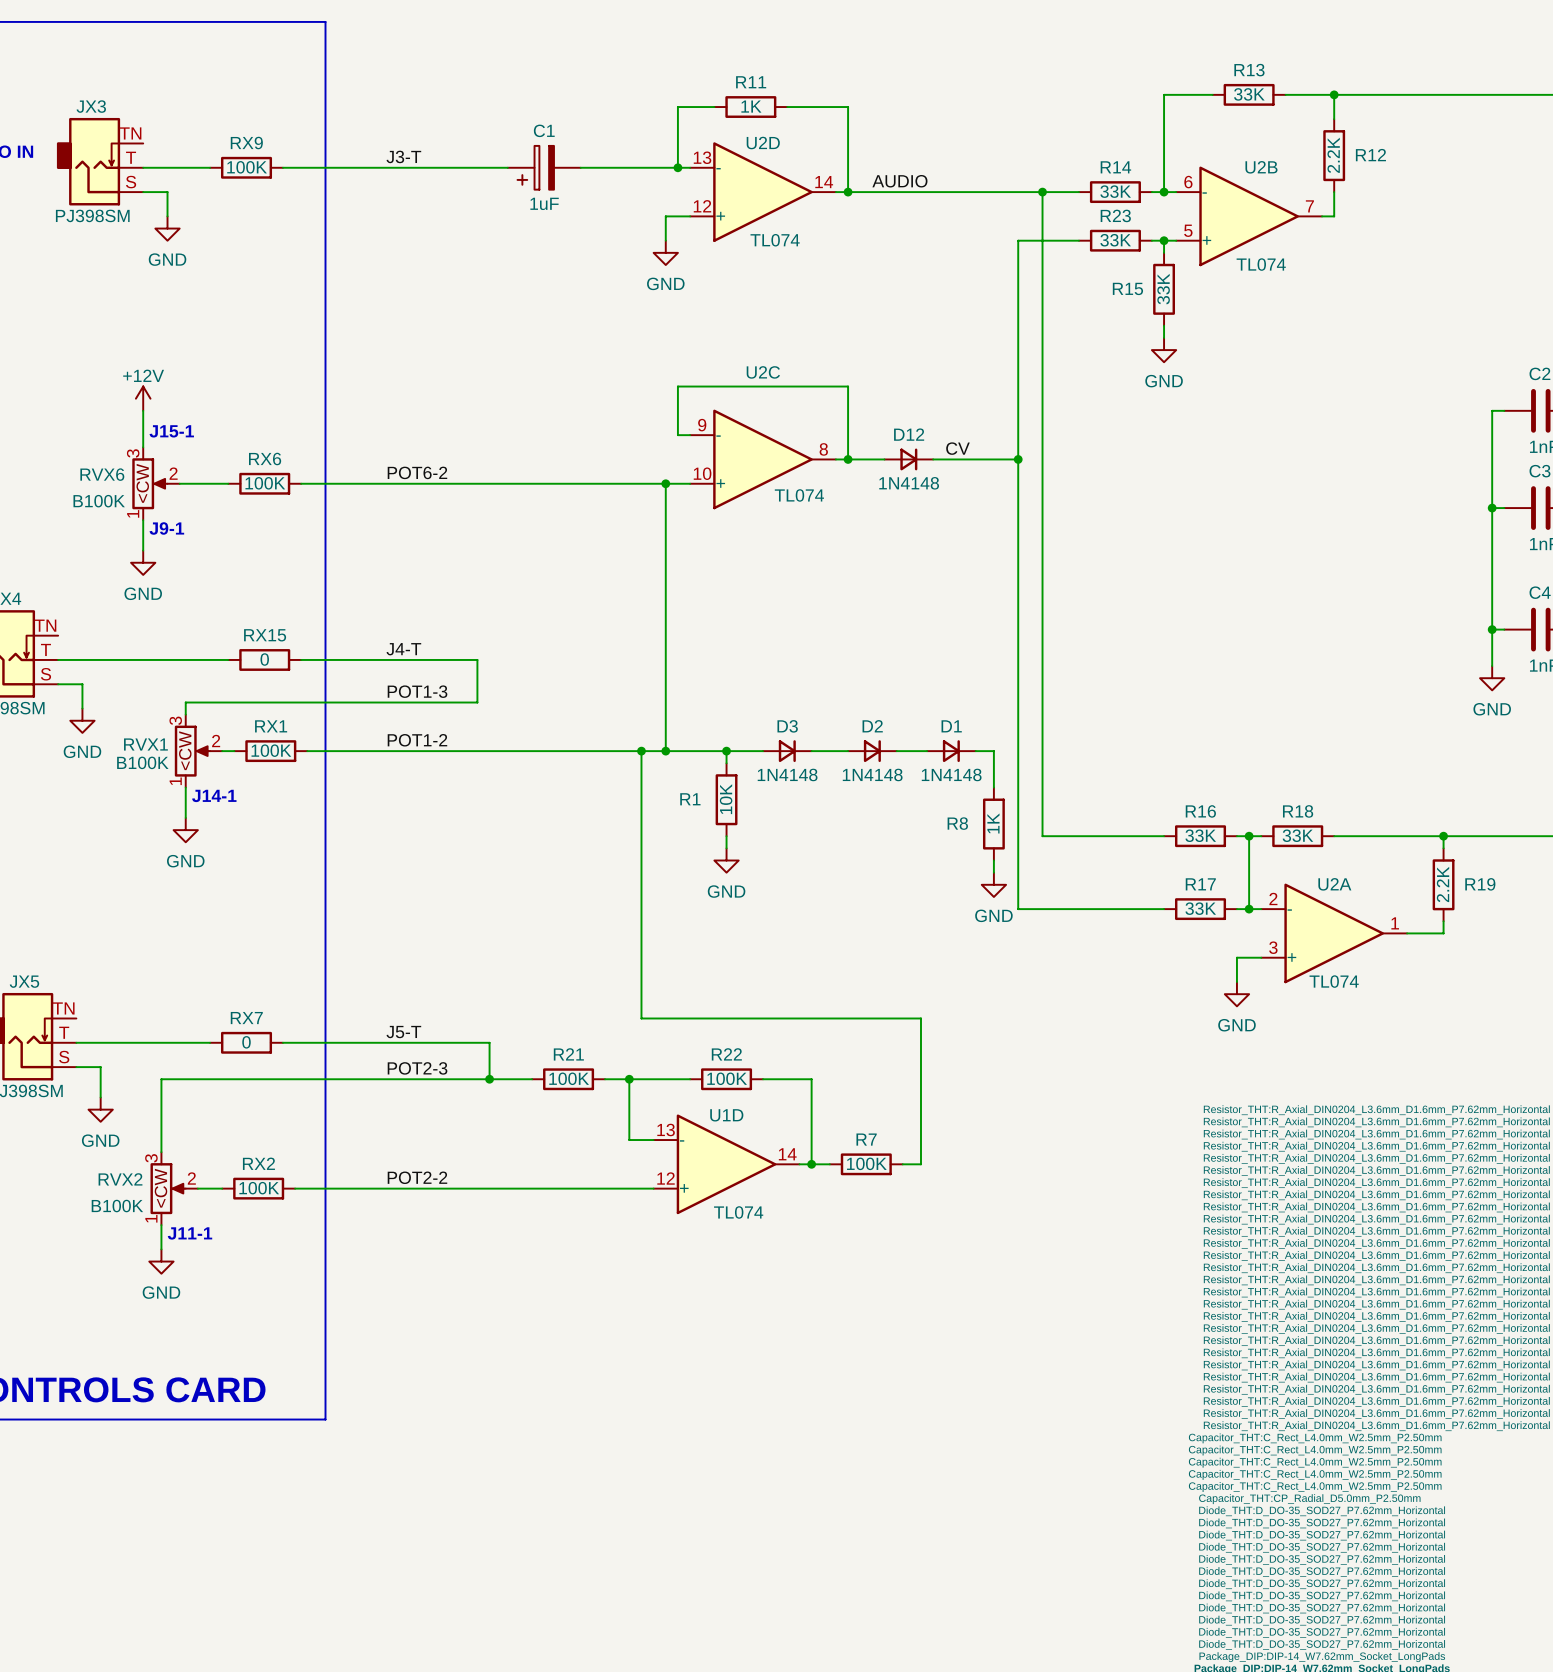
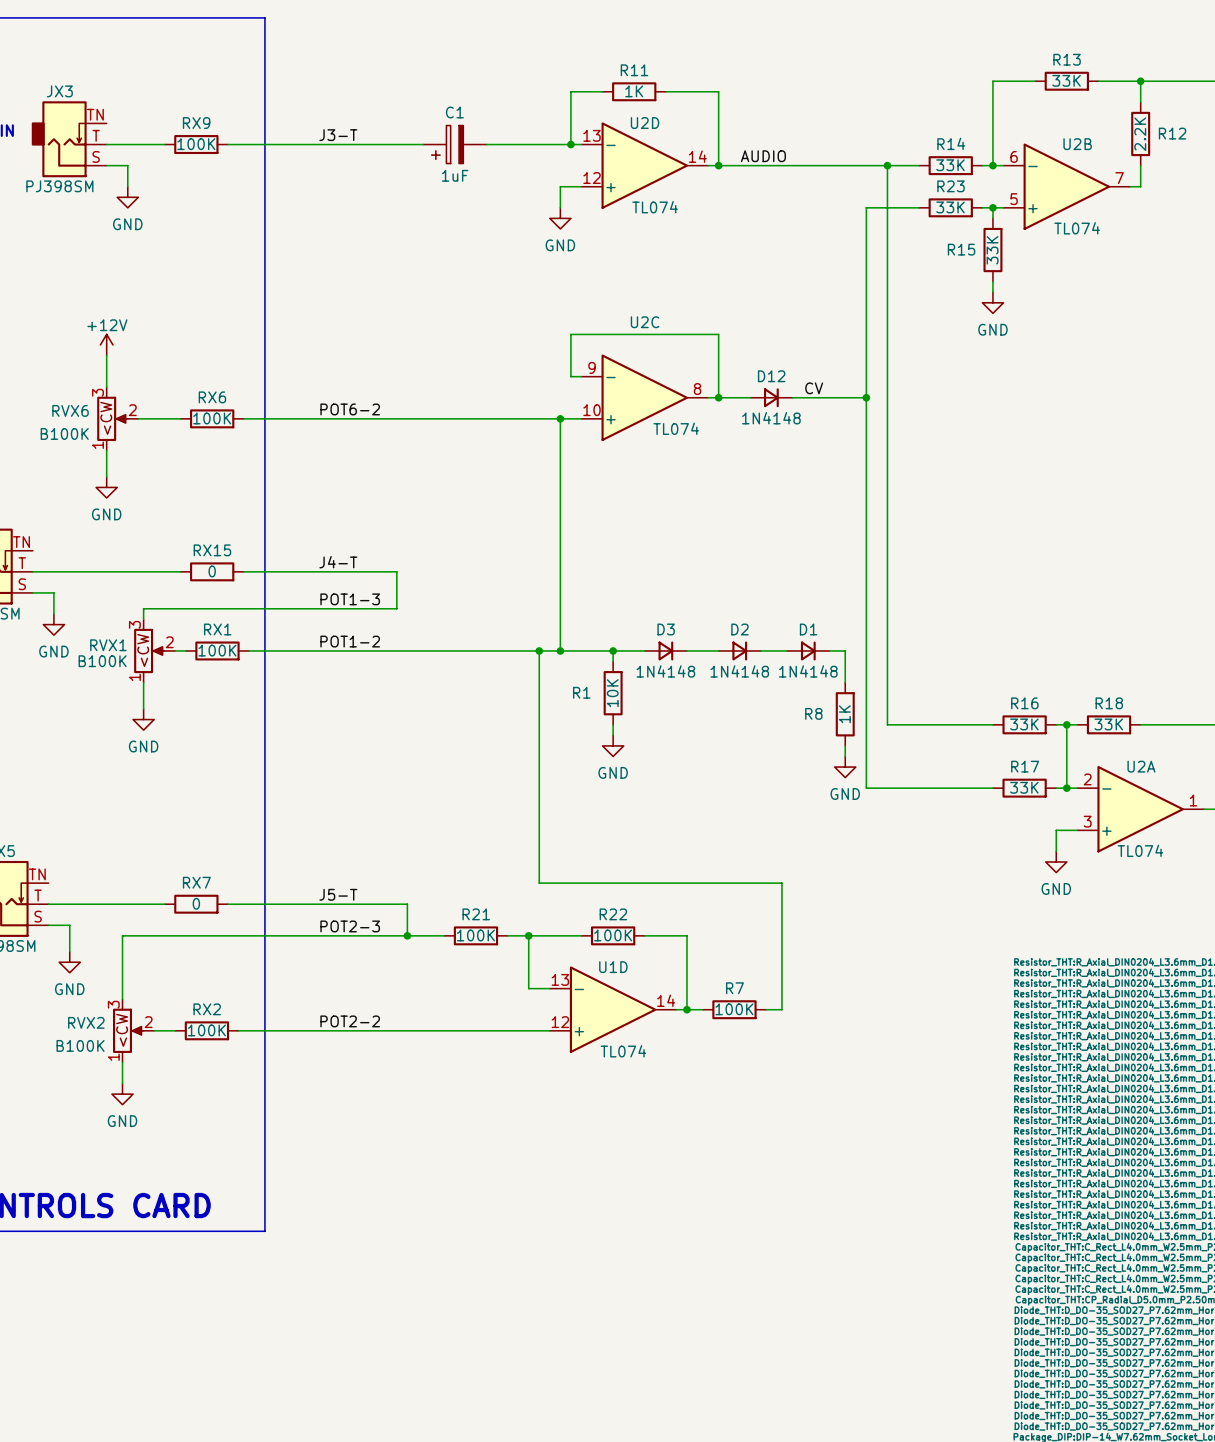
text: J15-1 (171, 431) -> none
text: J9-1 (166, 528) -> none
text: J14-1 (214, 795) -> none
text: J11-1 (189, 1233) -> none

